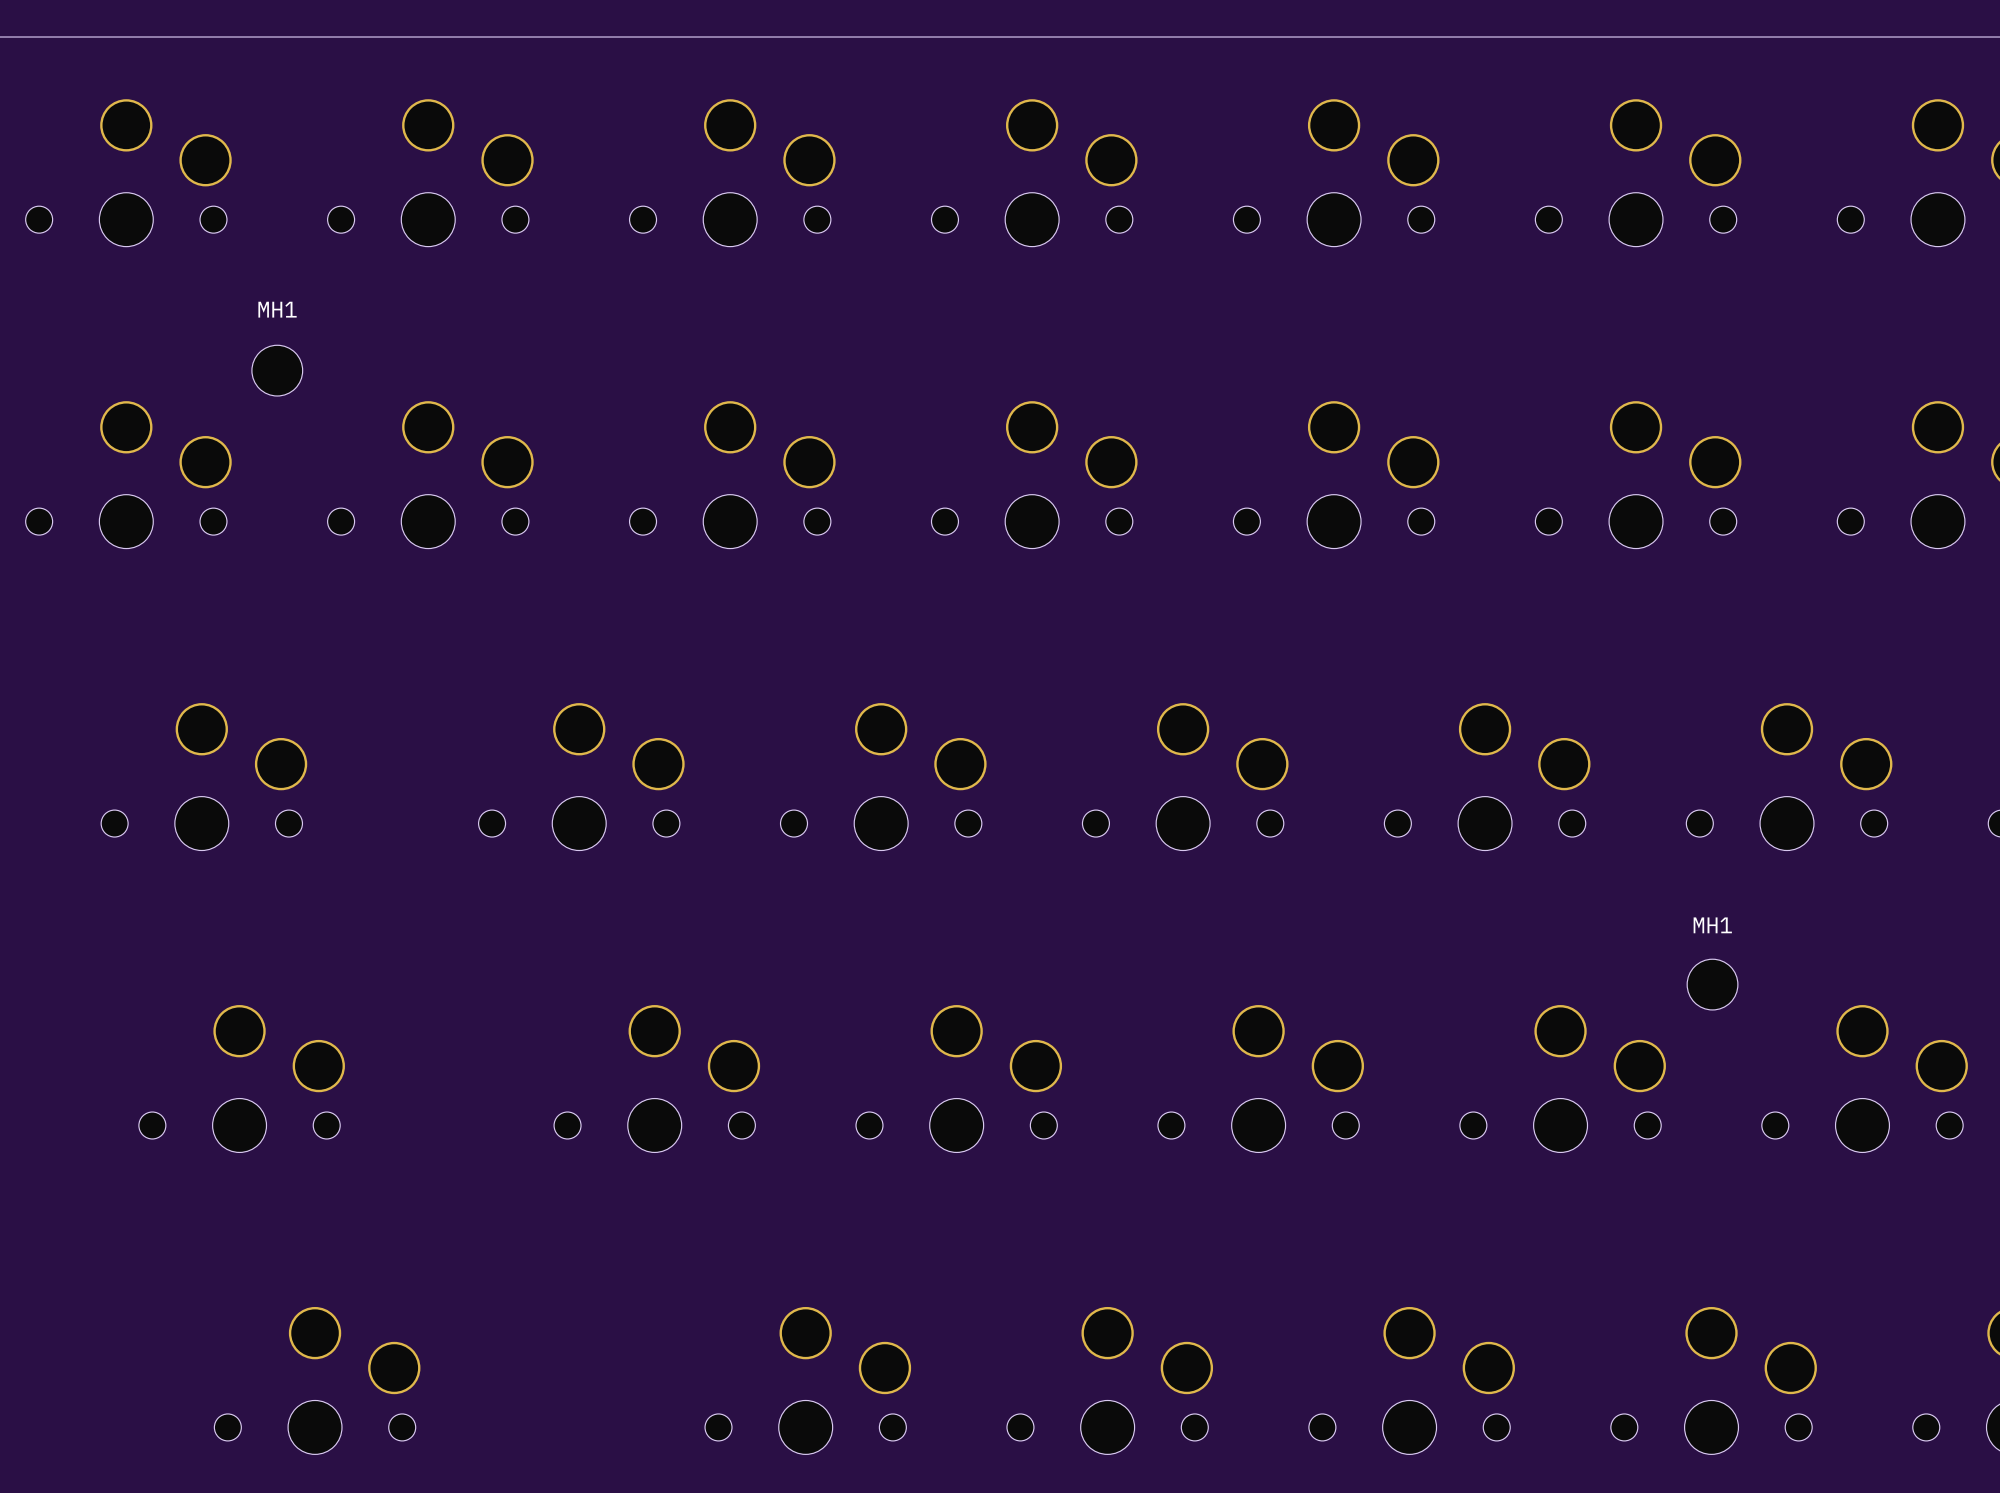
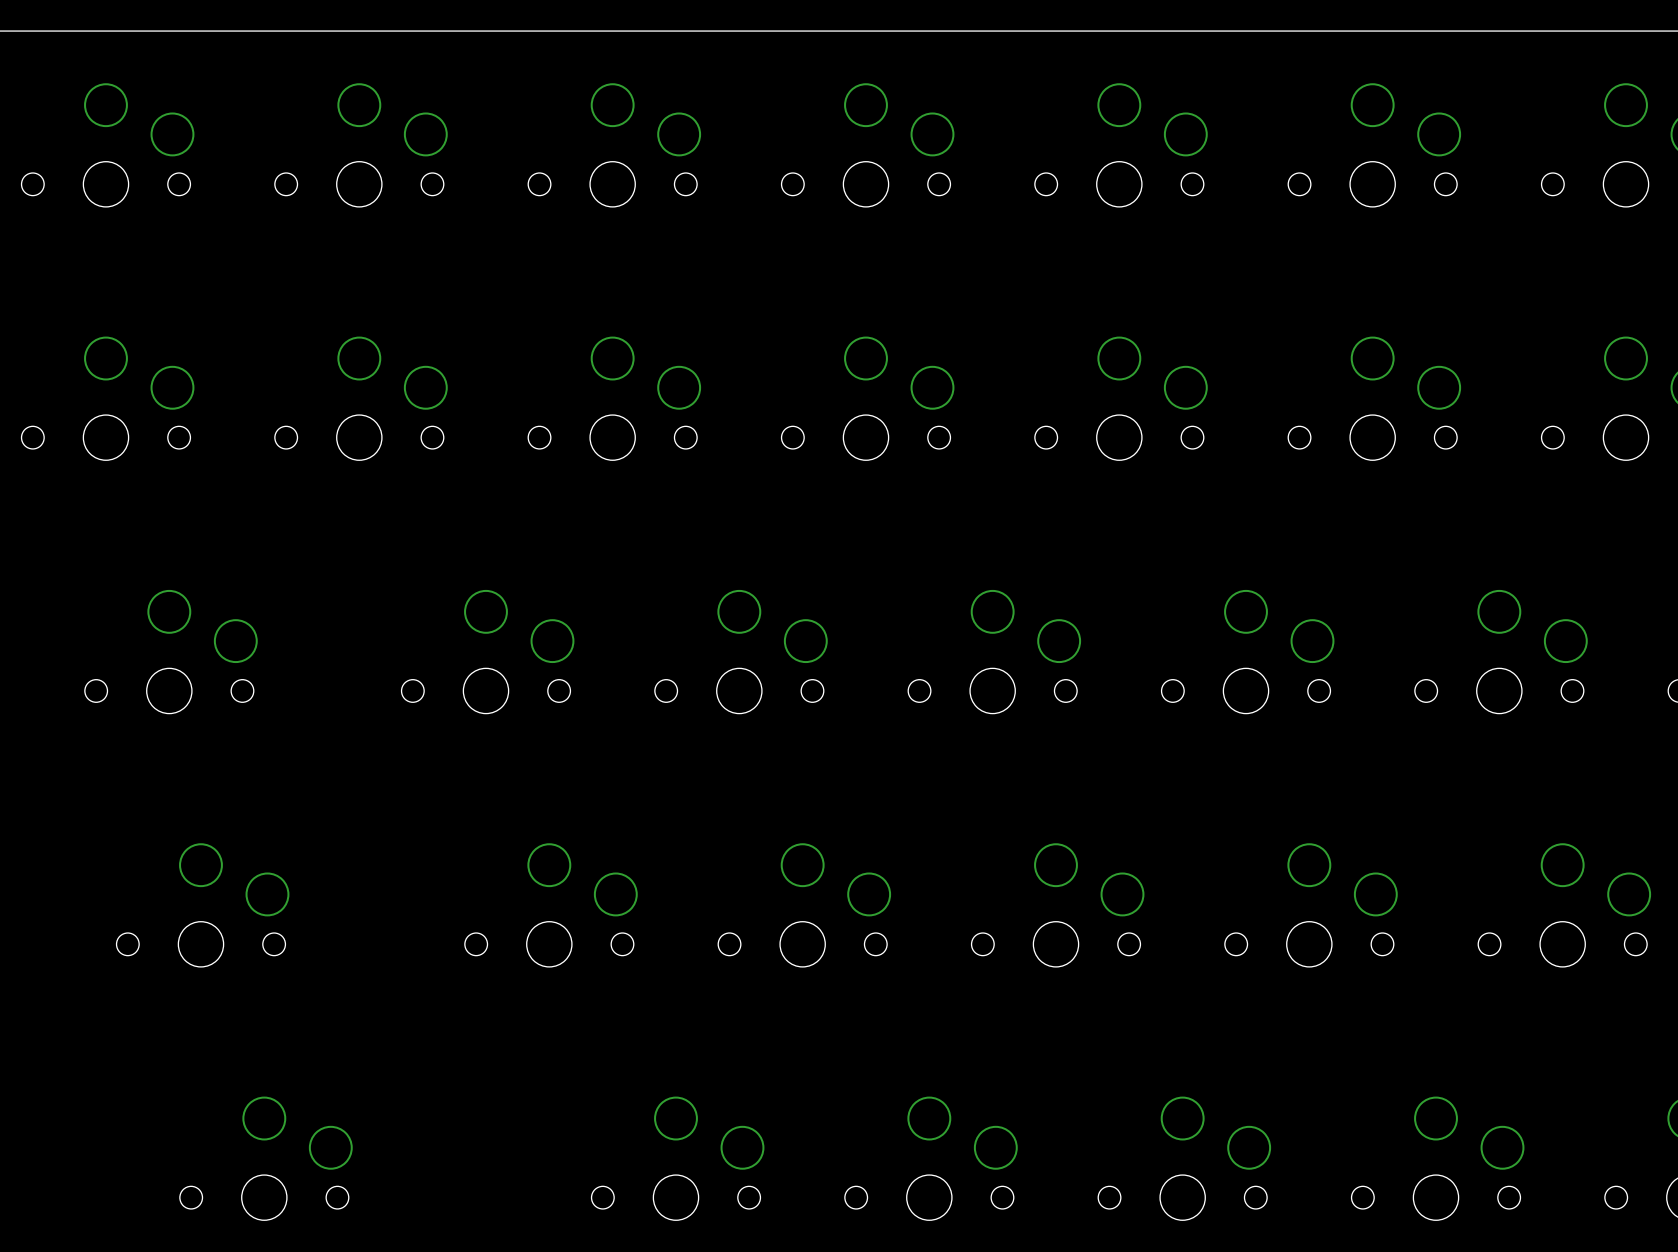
MH1: (277, 370) -> none
MH1: (1712, 984) -> none

